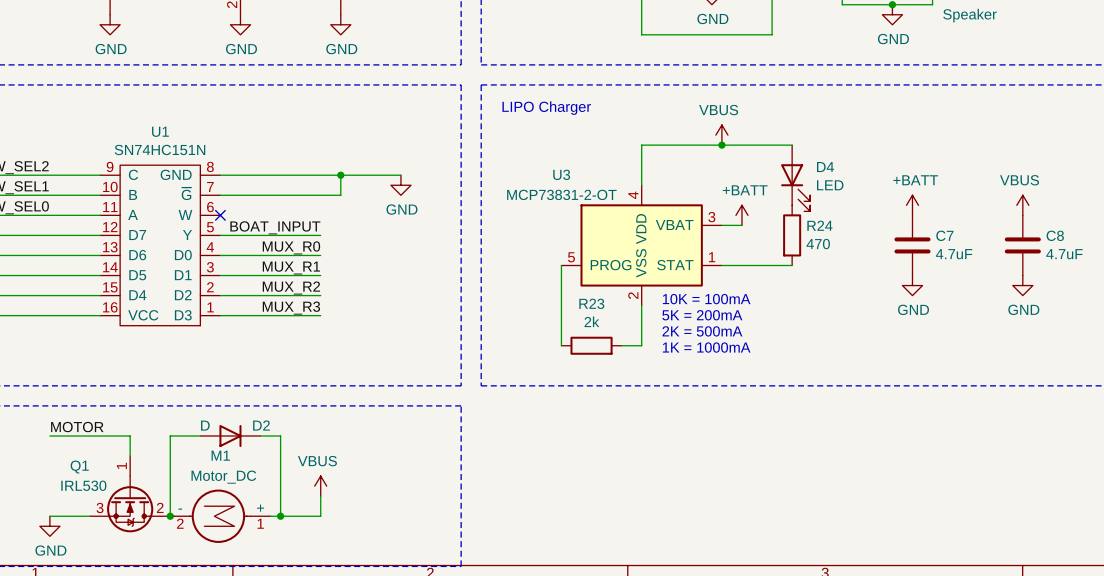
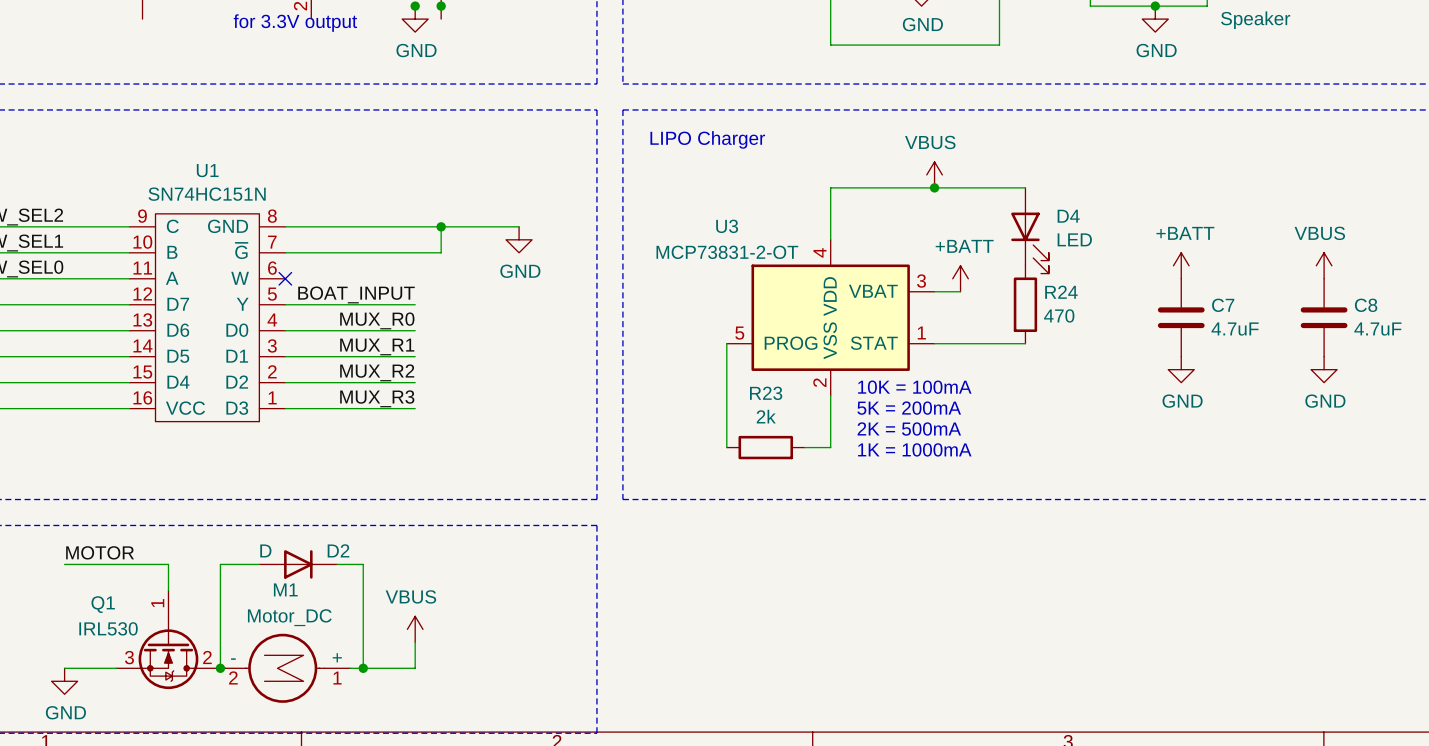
junction: none -> (415, 6)
junction: none -> (441, 6)
text: none -> for 3.3V output (295, 23)
power symbol: GND (110, 24) -> none
power symbol: GND (240, 24) -> none
power symbol position: GND (340, 24) -> GND (415, 19)

